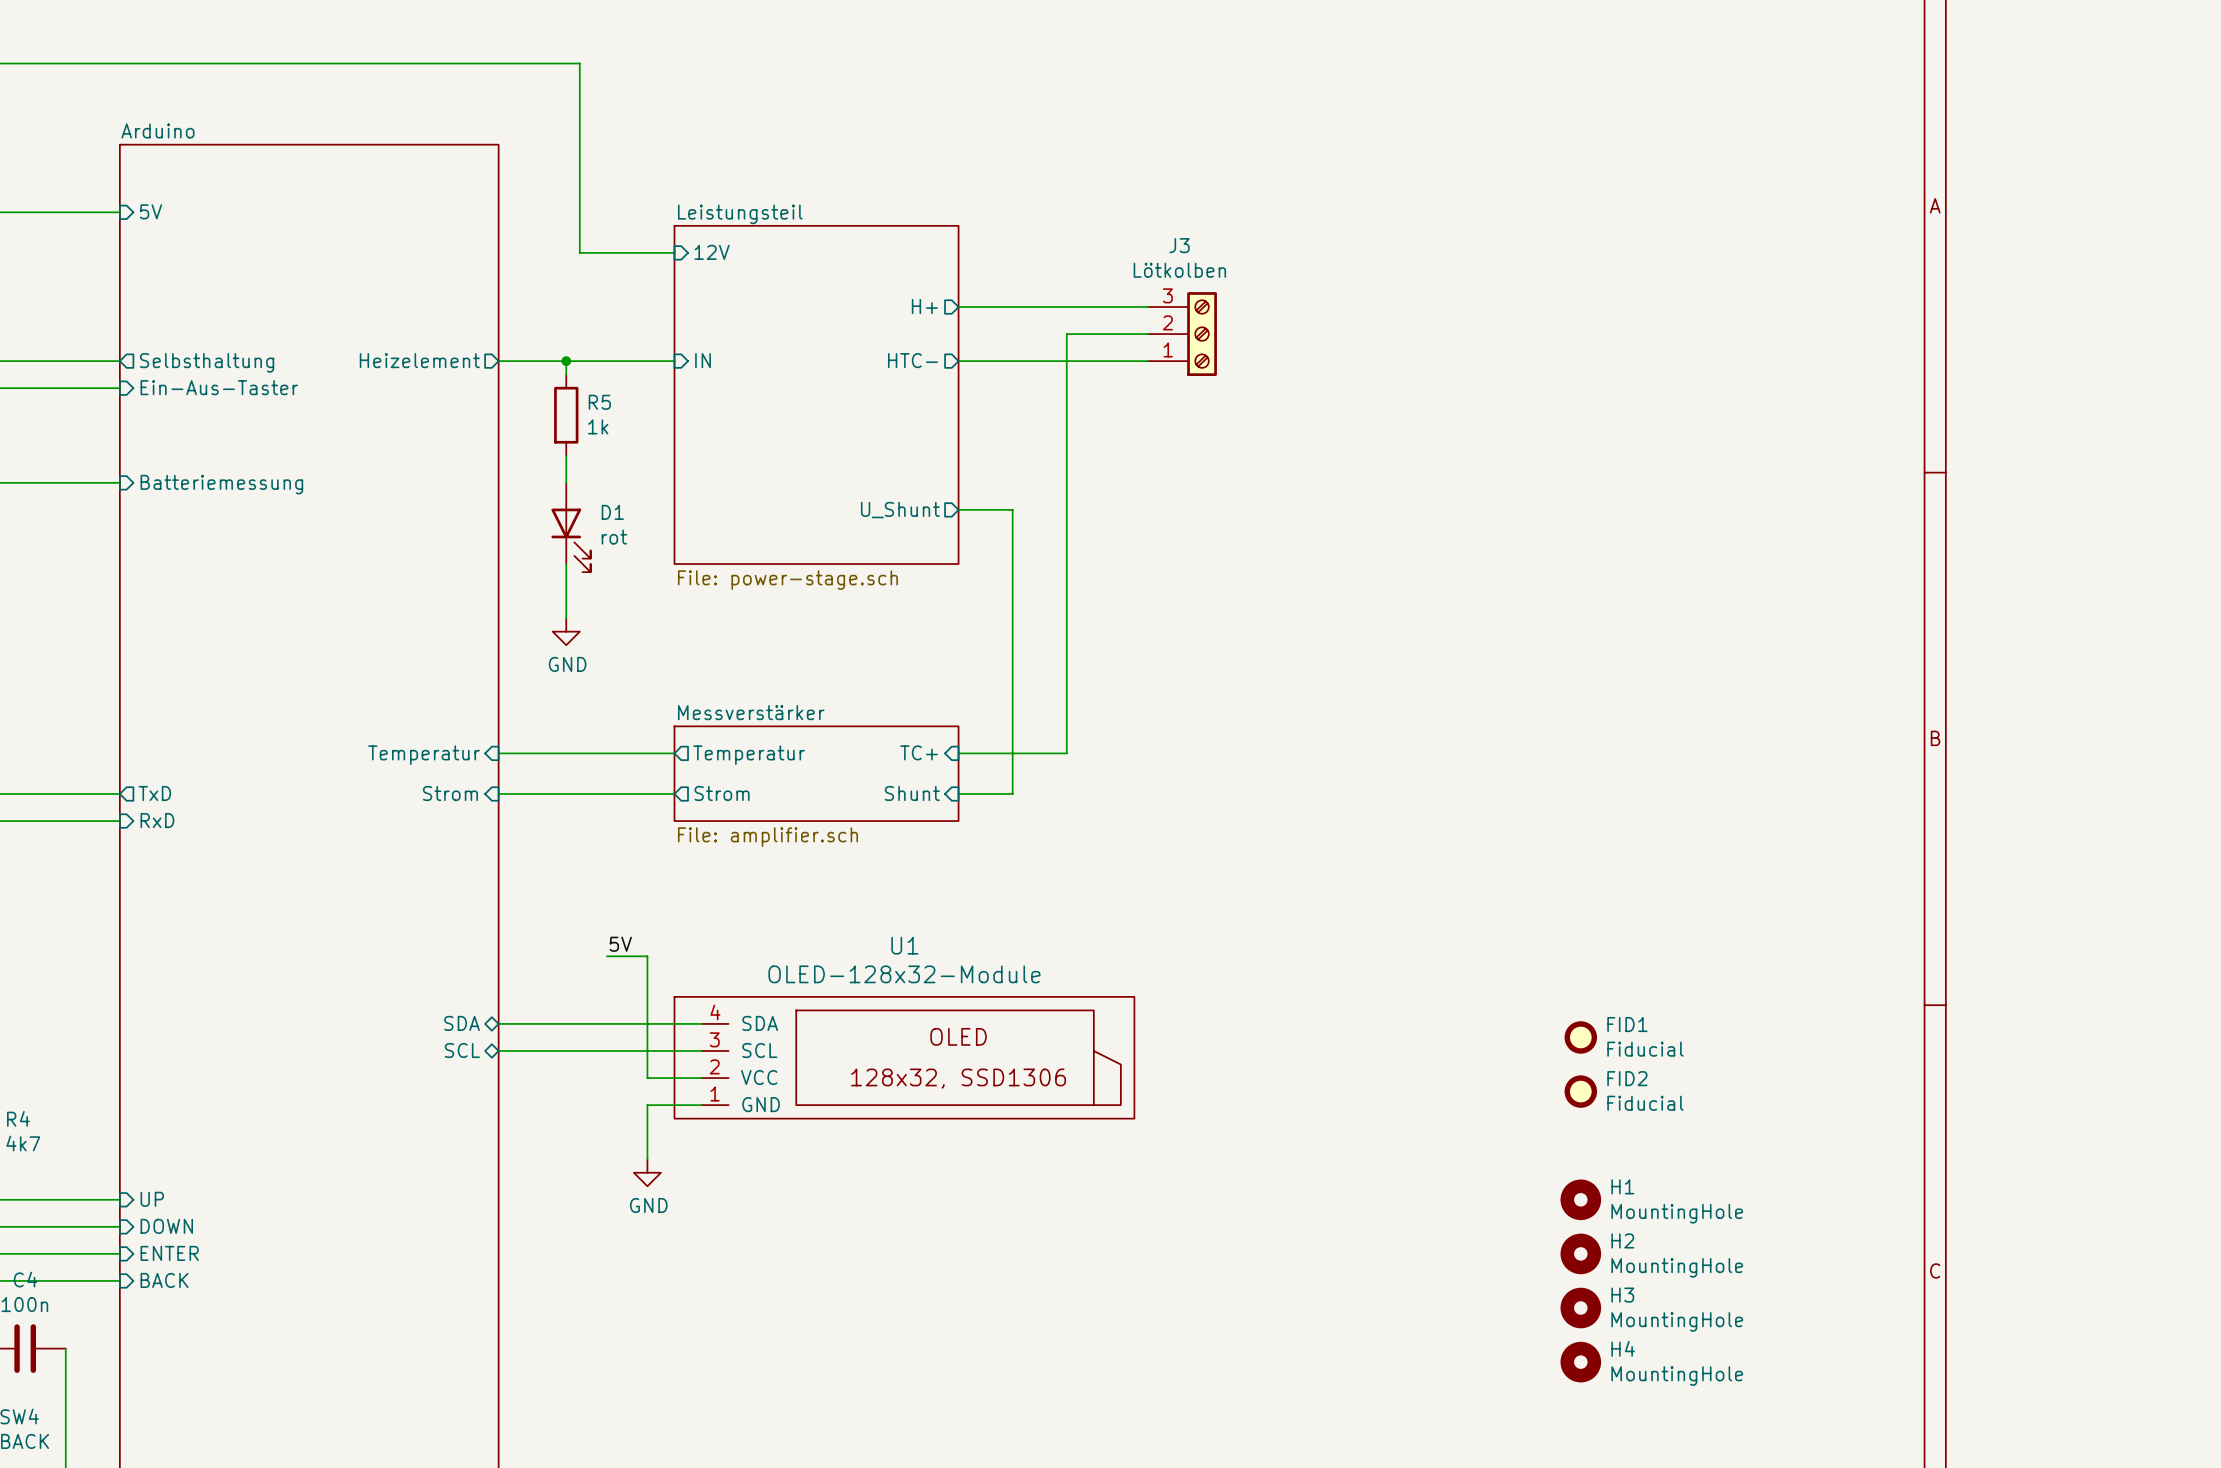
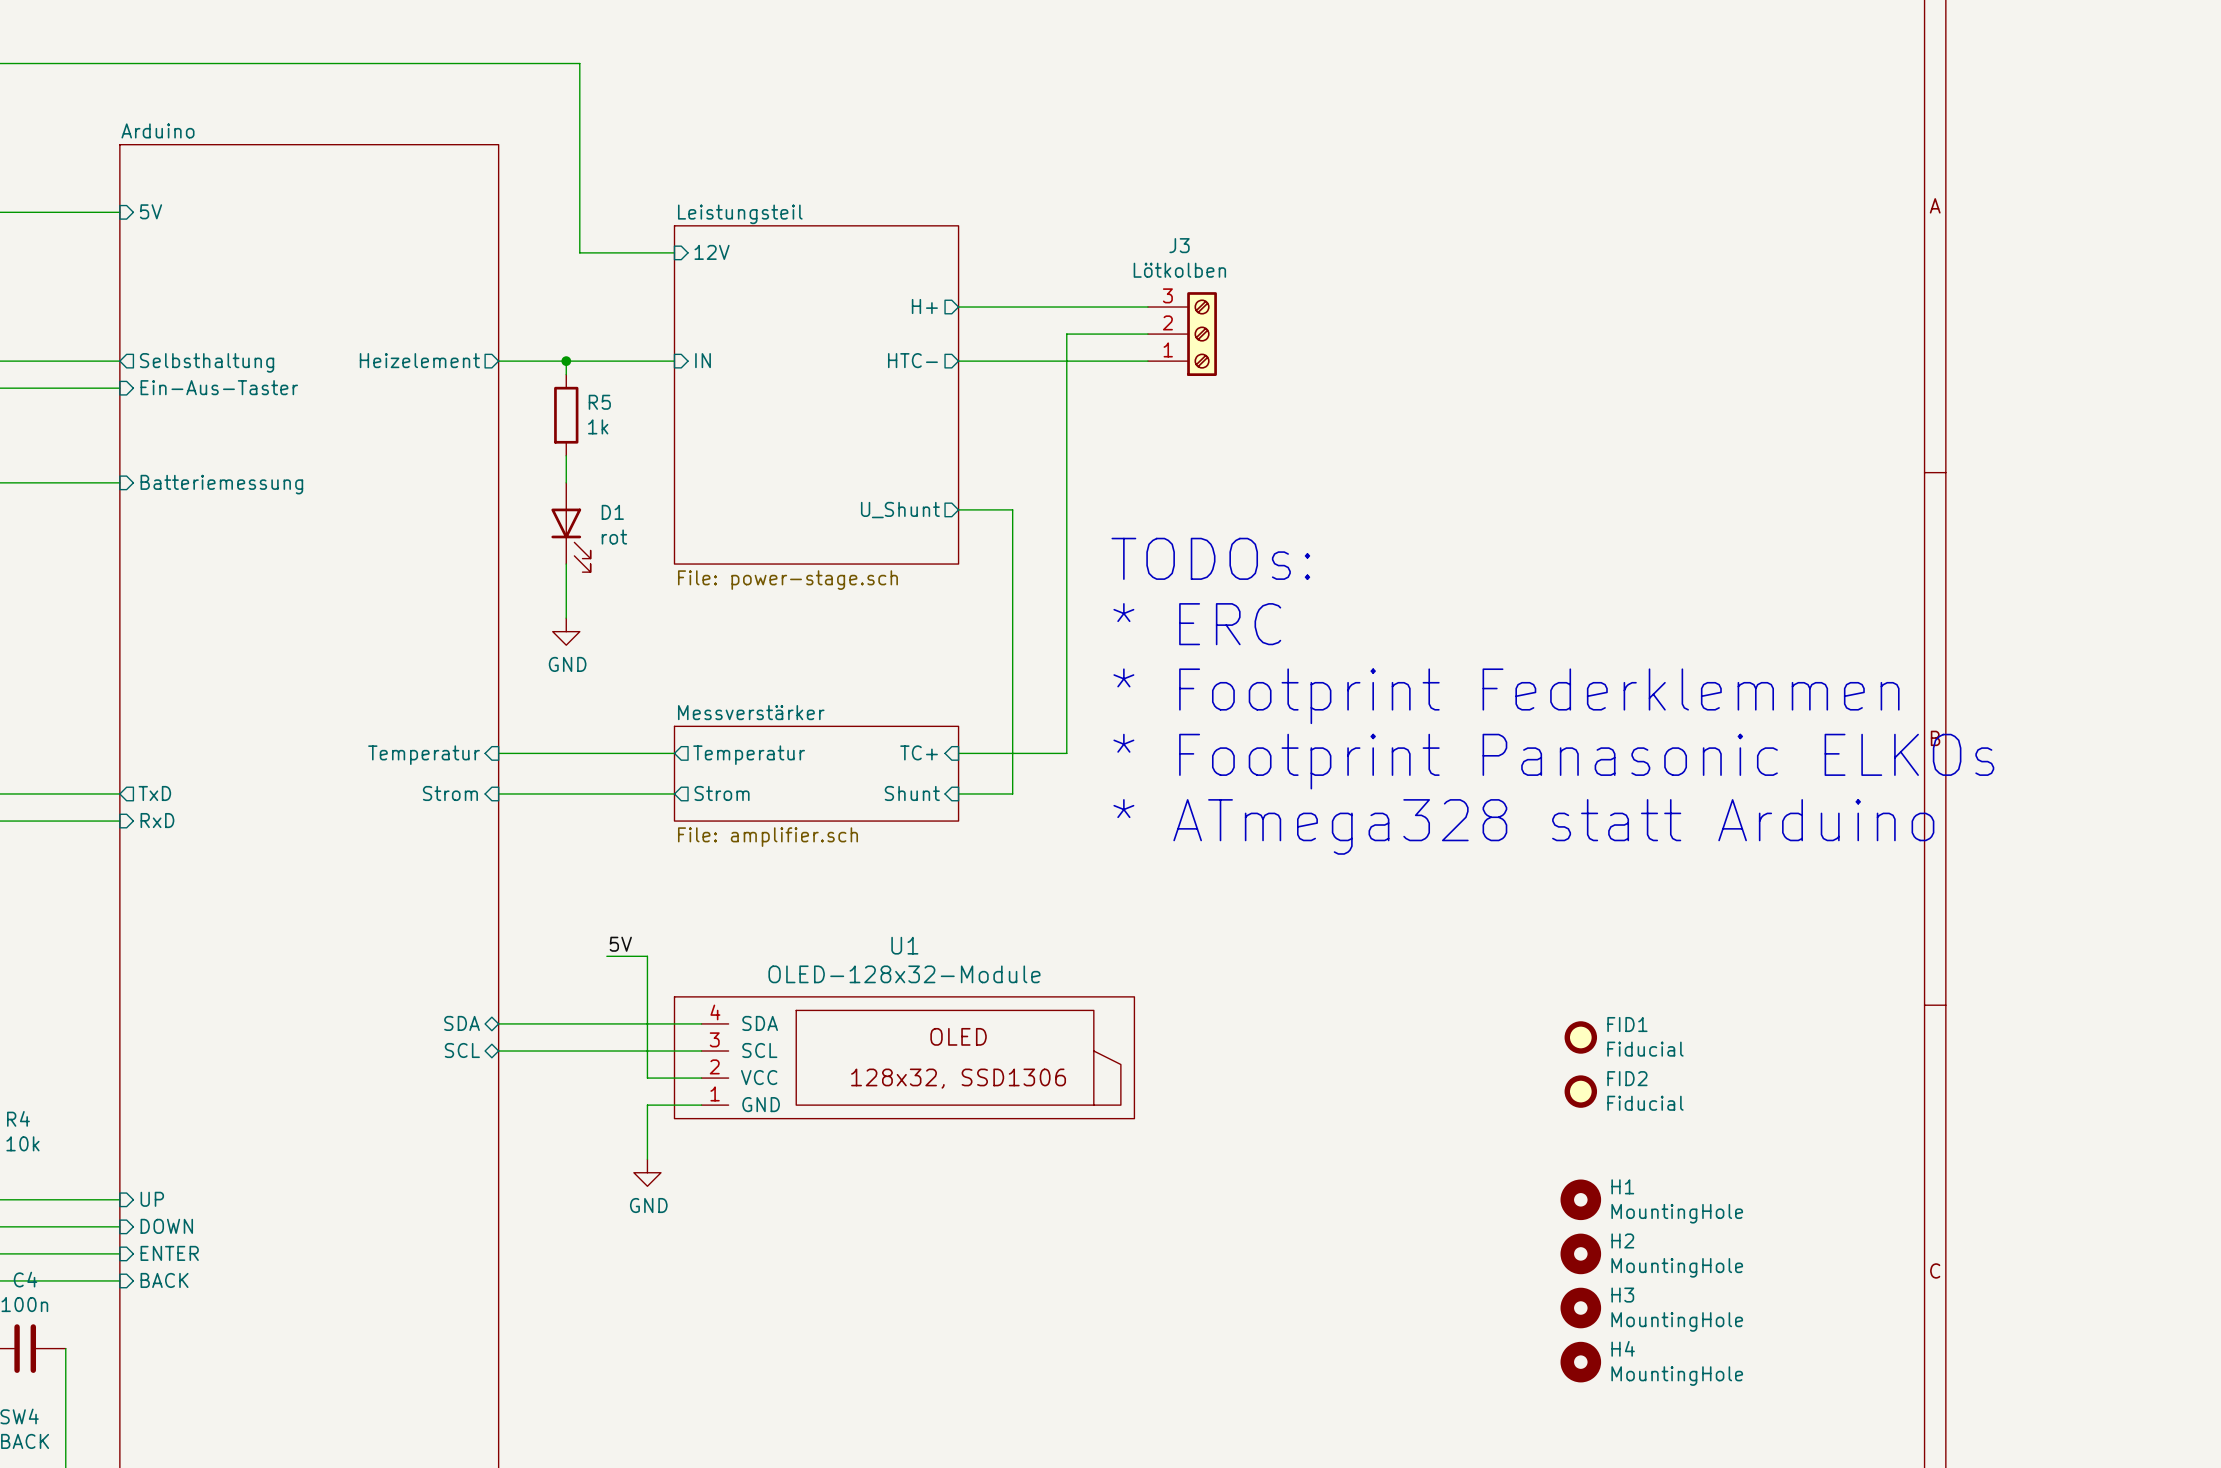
text: none -> TODOs: (1210, 558)
text: none -> * ERC (1197, 624)
text: none -> * Footprint Federklemmen (1506, 696)
text: none -> * Footprint Panasonic ELKOs (1553, 761)
text: none -> * ATmega328 statt Arduino (1523, 826)
R4 value: 4k7 (23, 1143) -> 10k (22, 1143)

